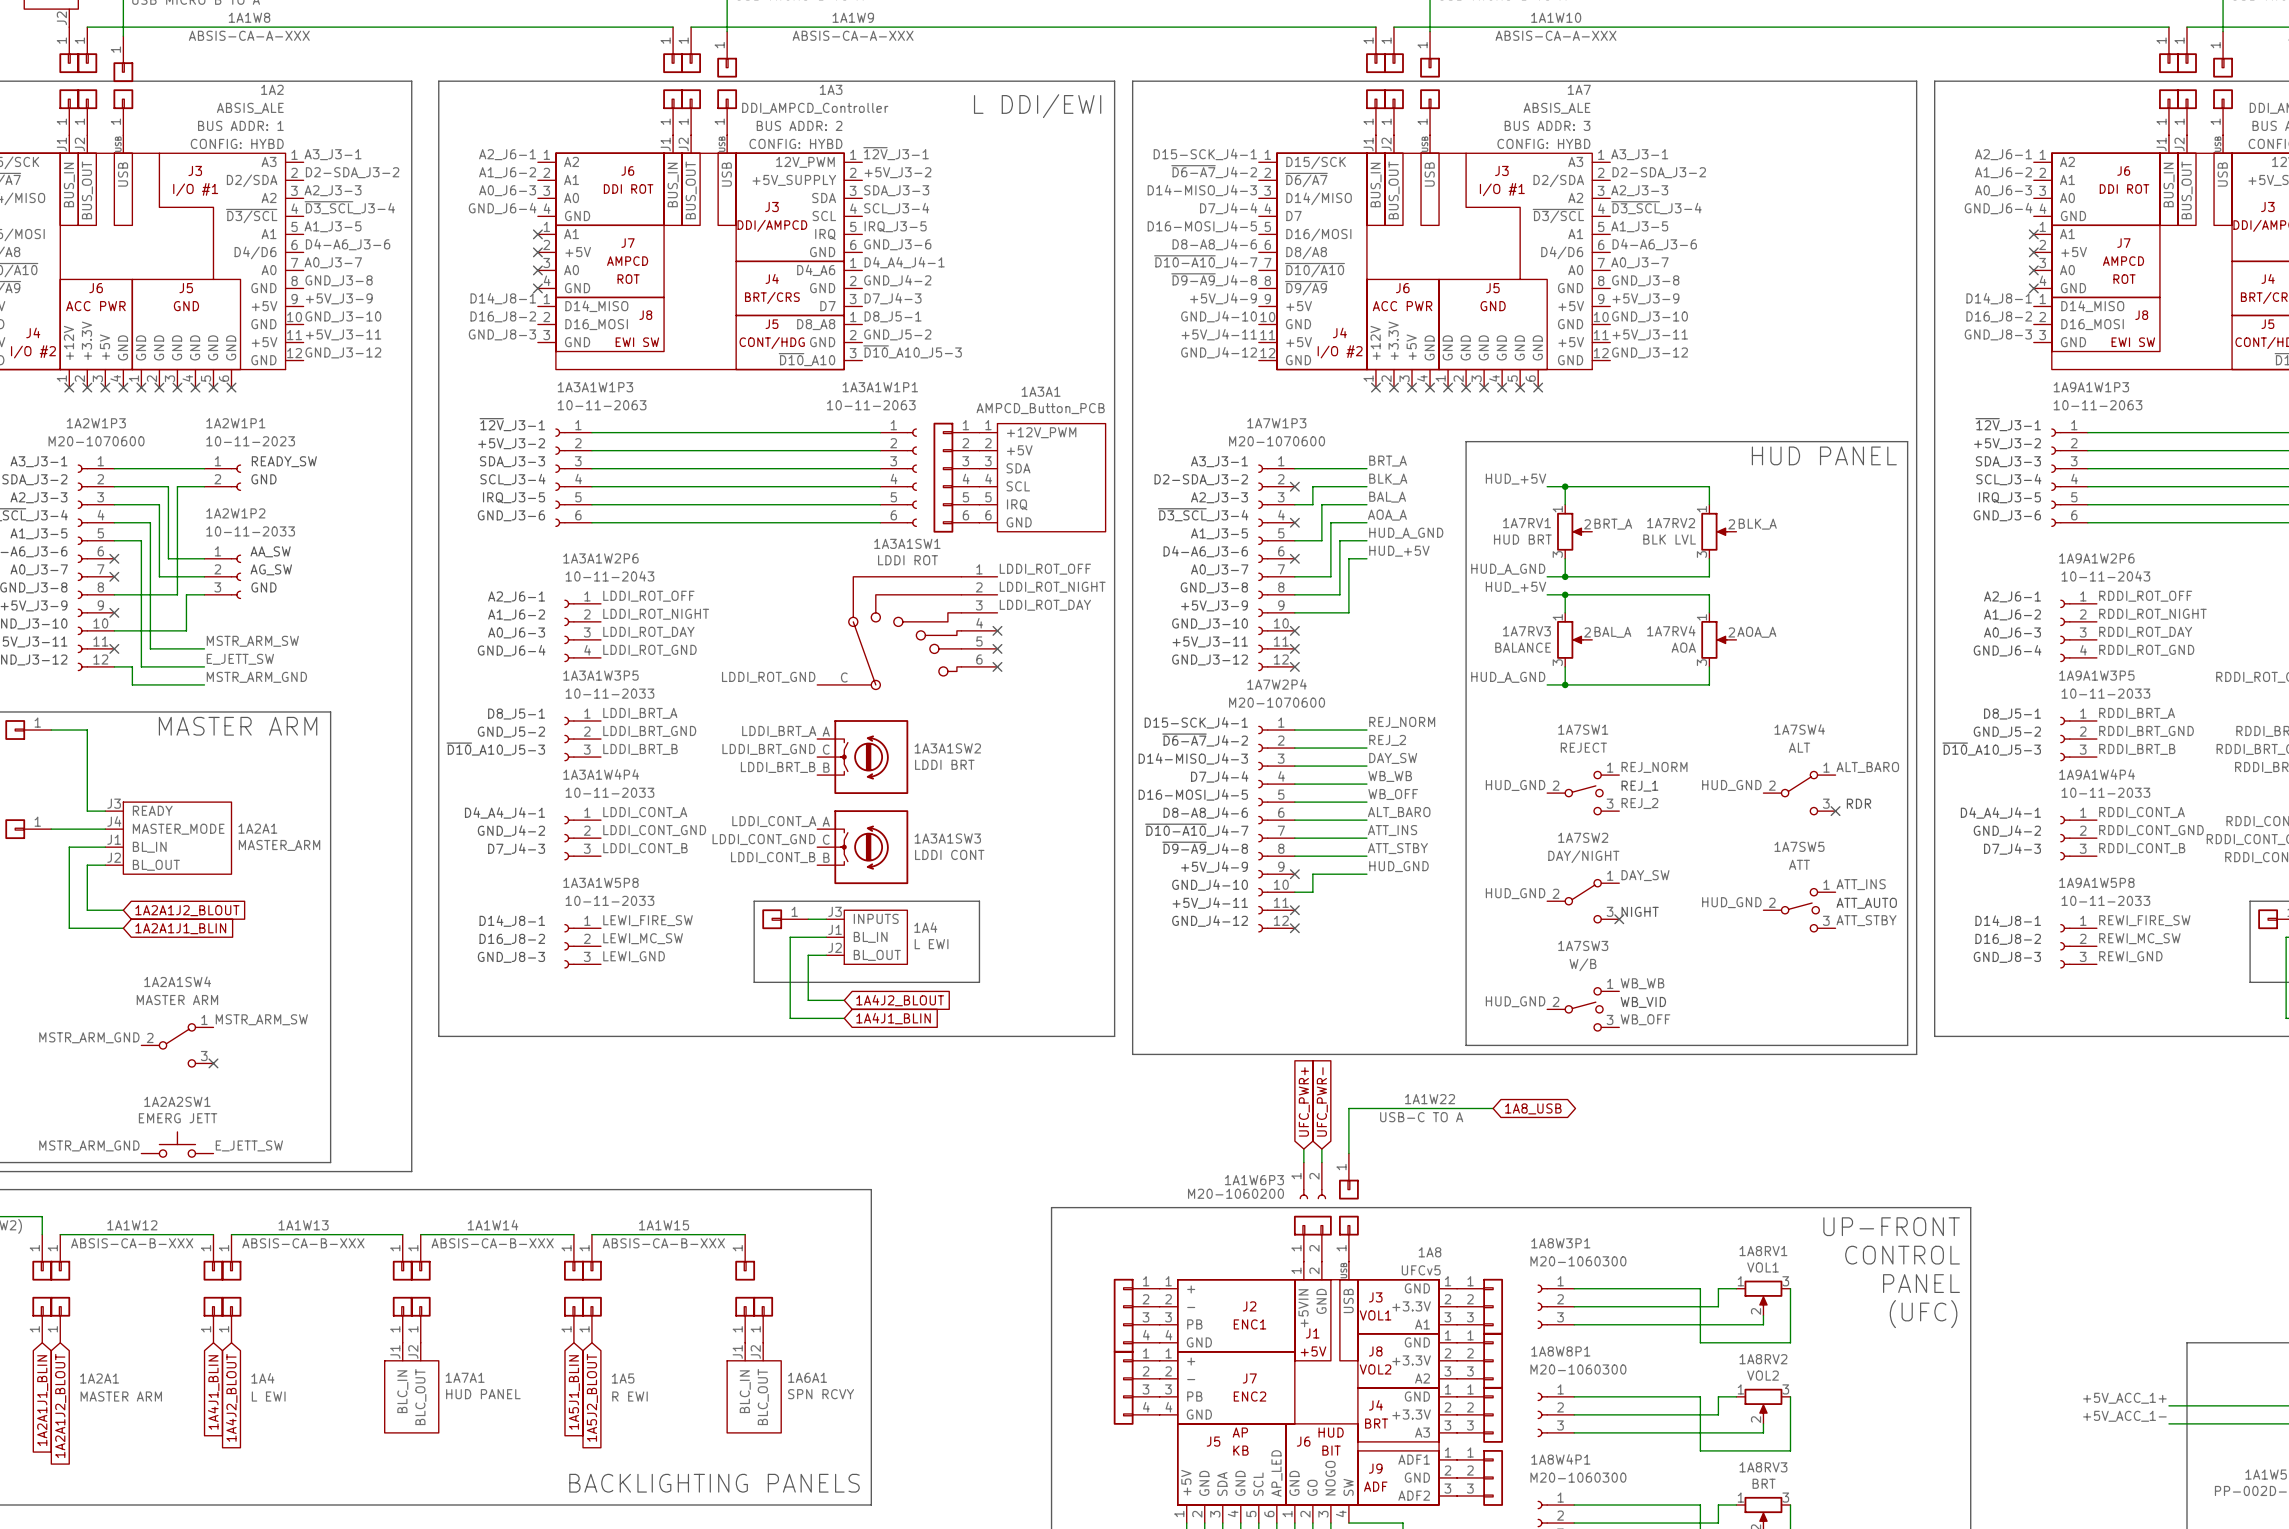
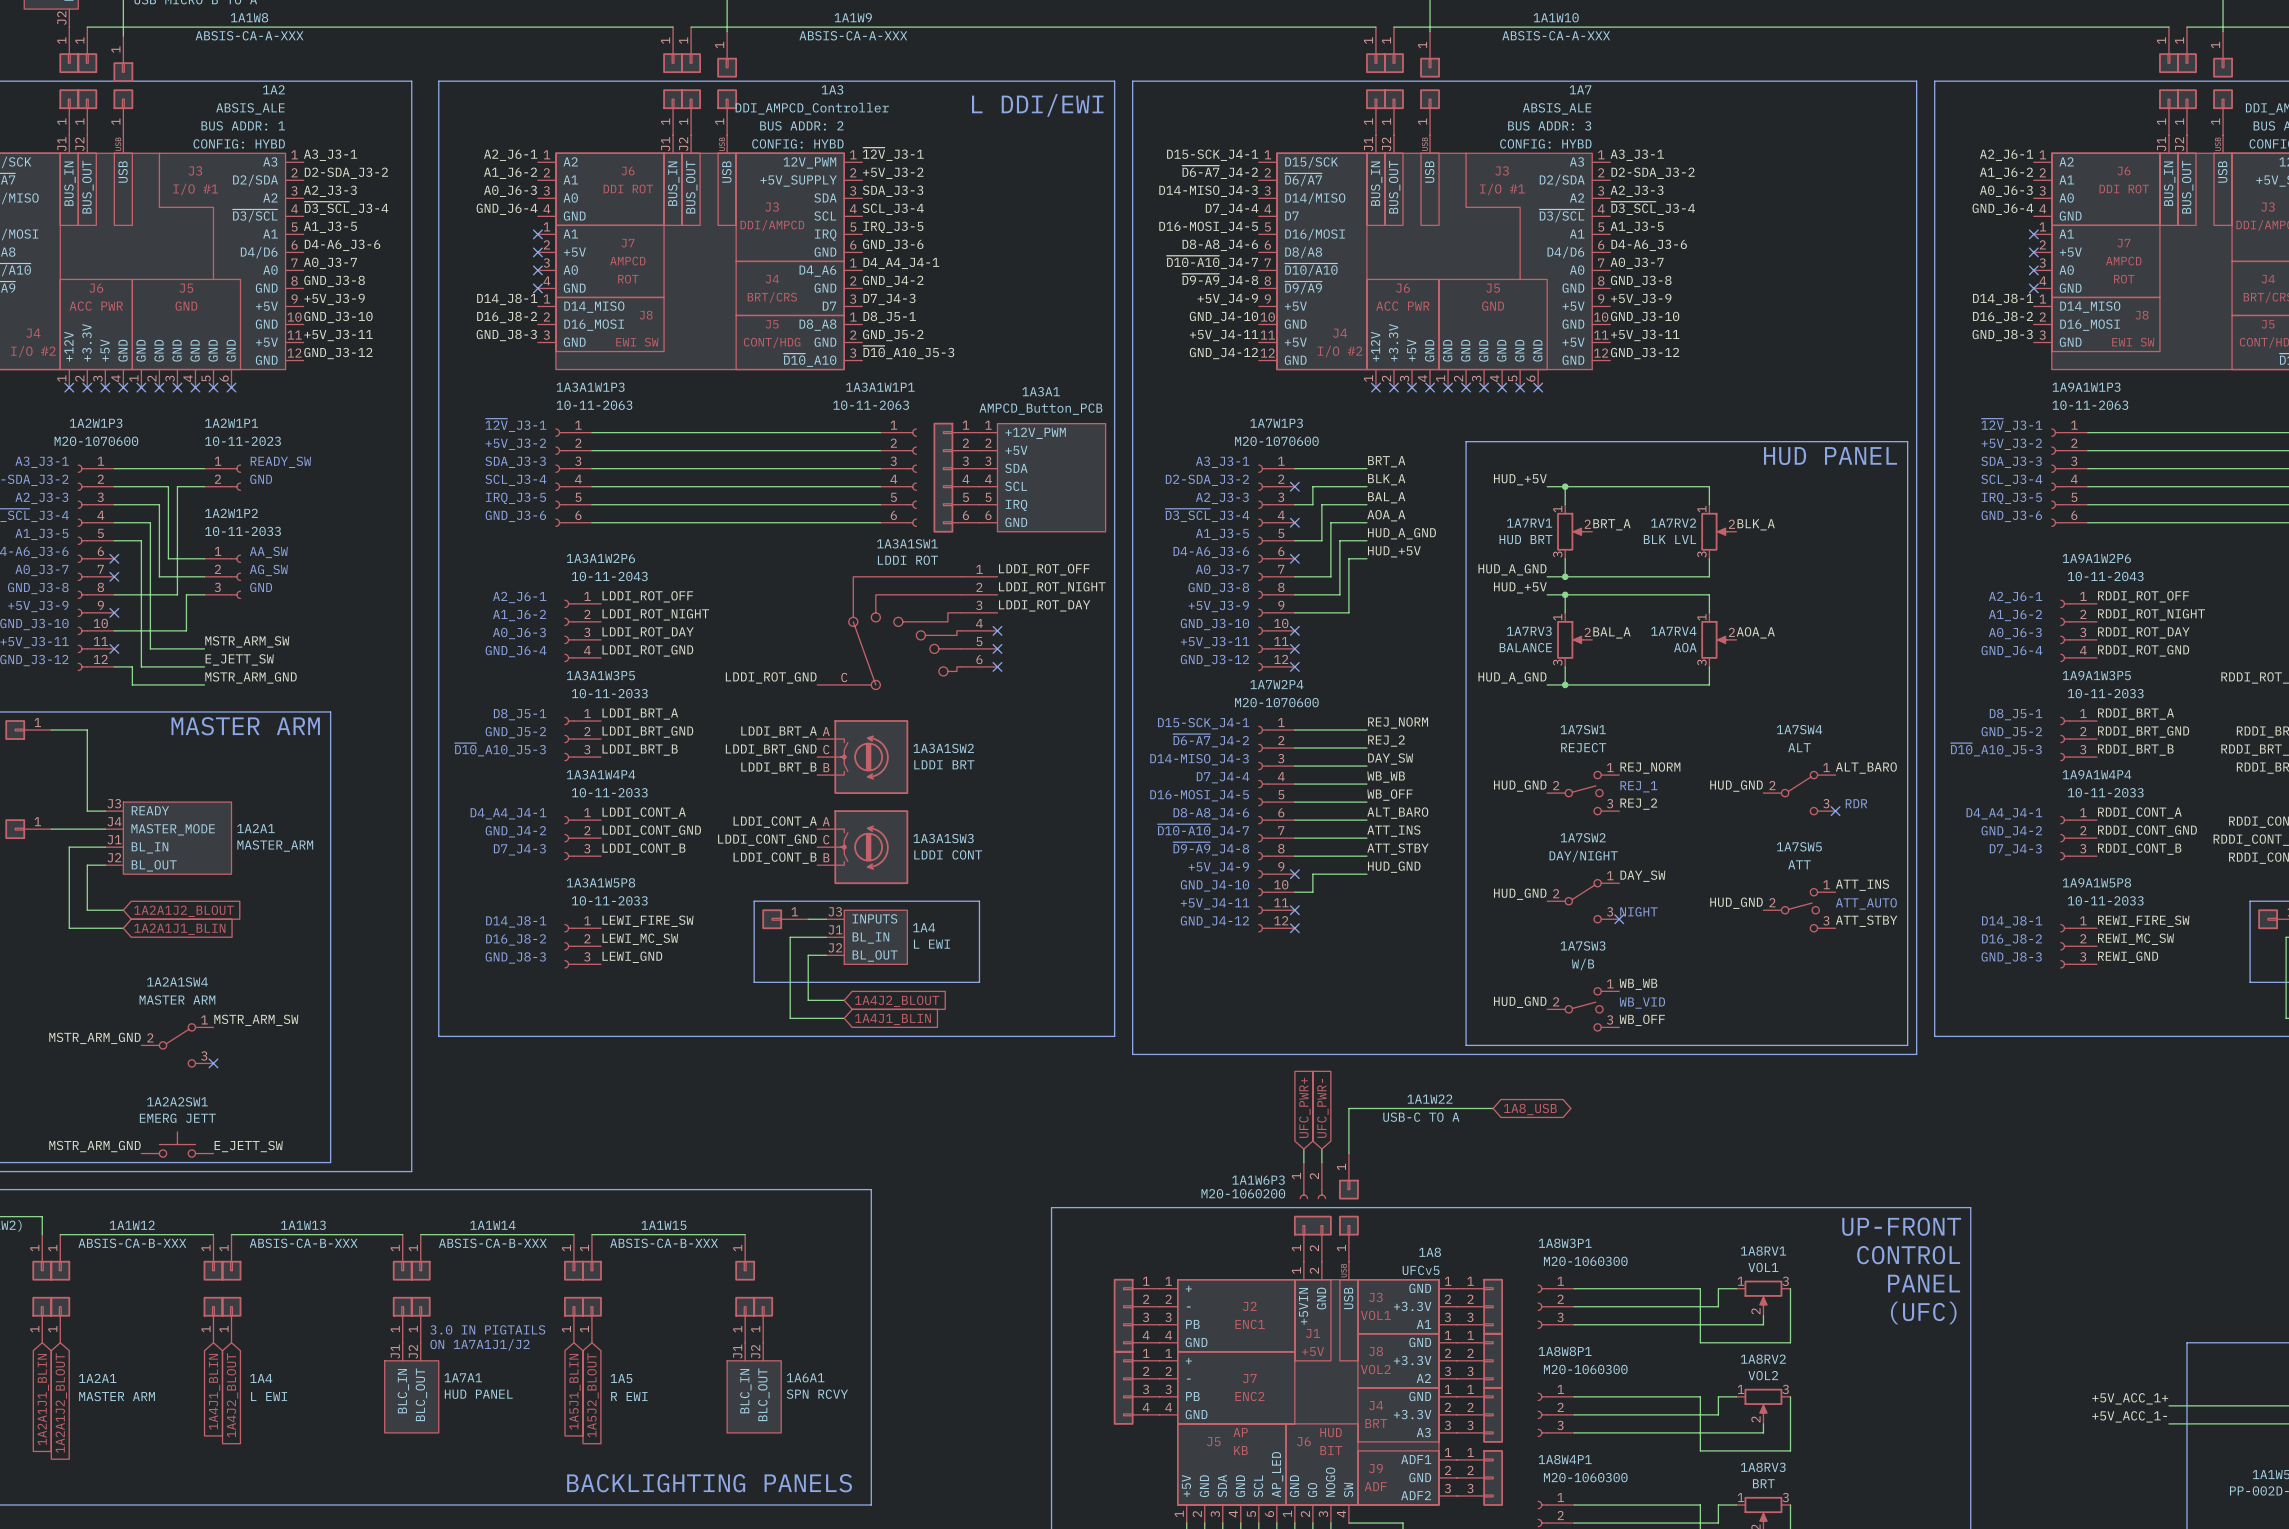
text: none -> 3.0 IN PIGTAILS (487, 1329)
text: none -> ON 1A7A1J1/J2 (480, 1344)

